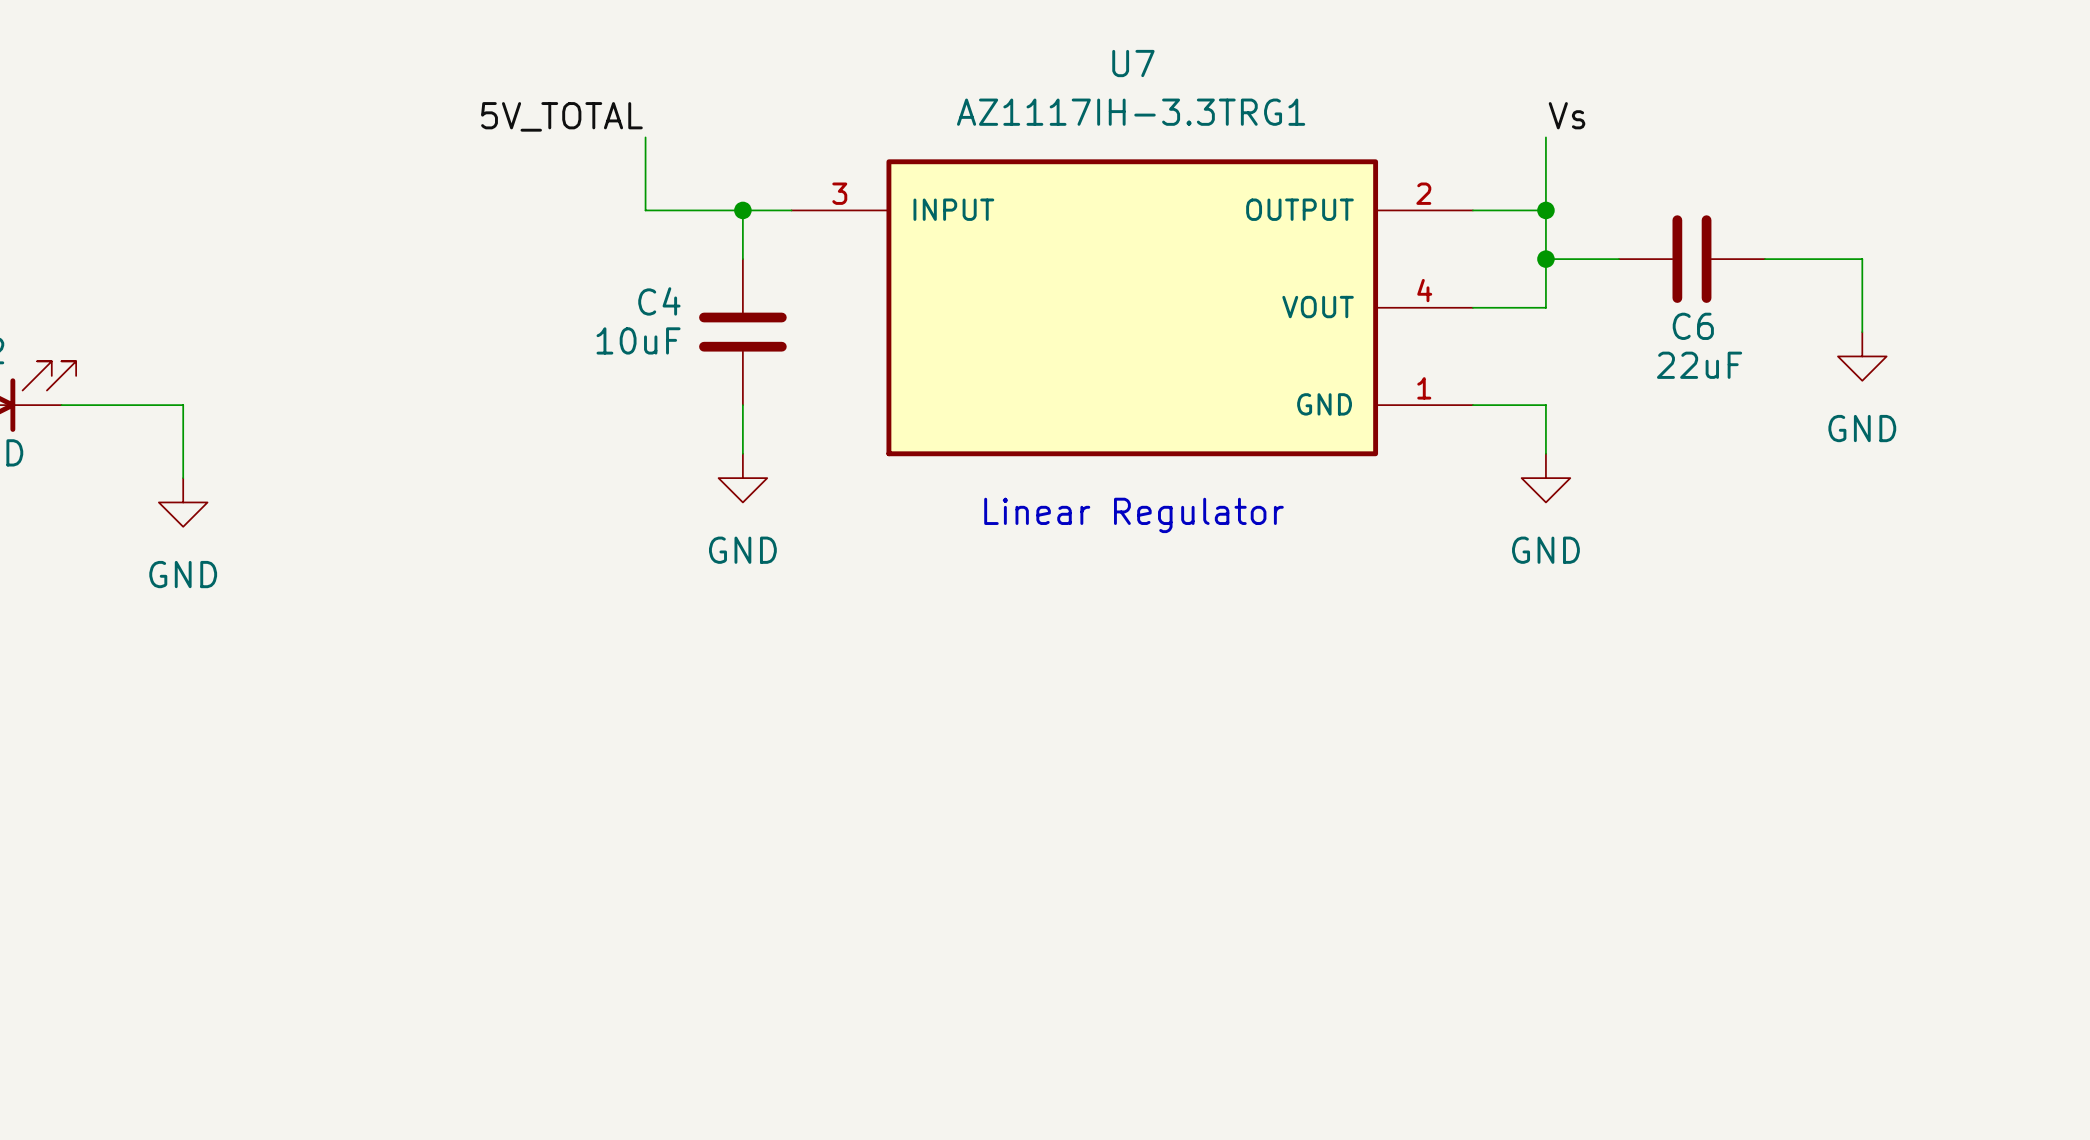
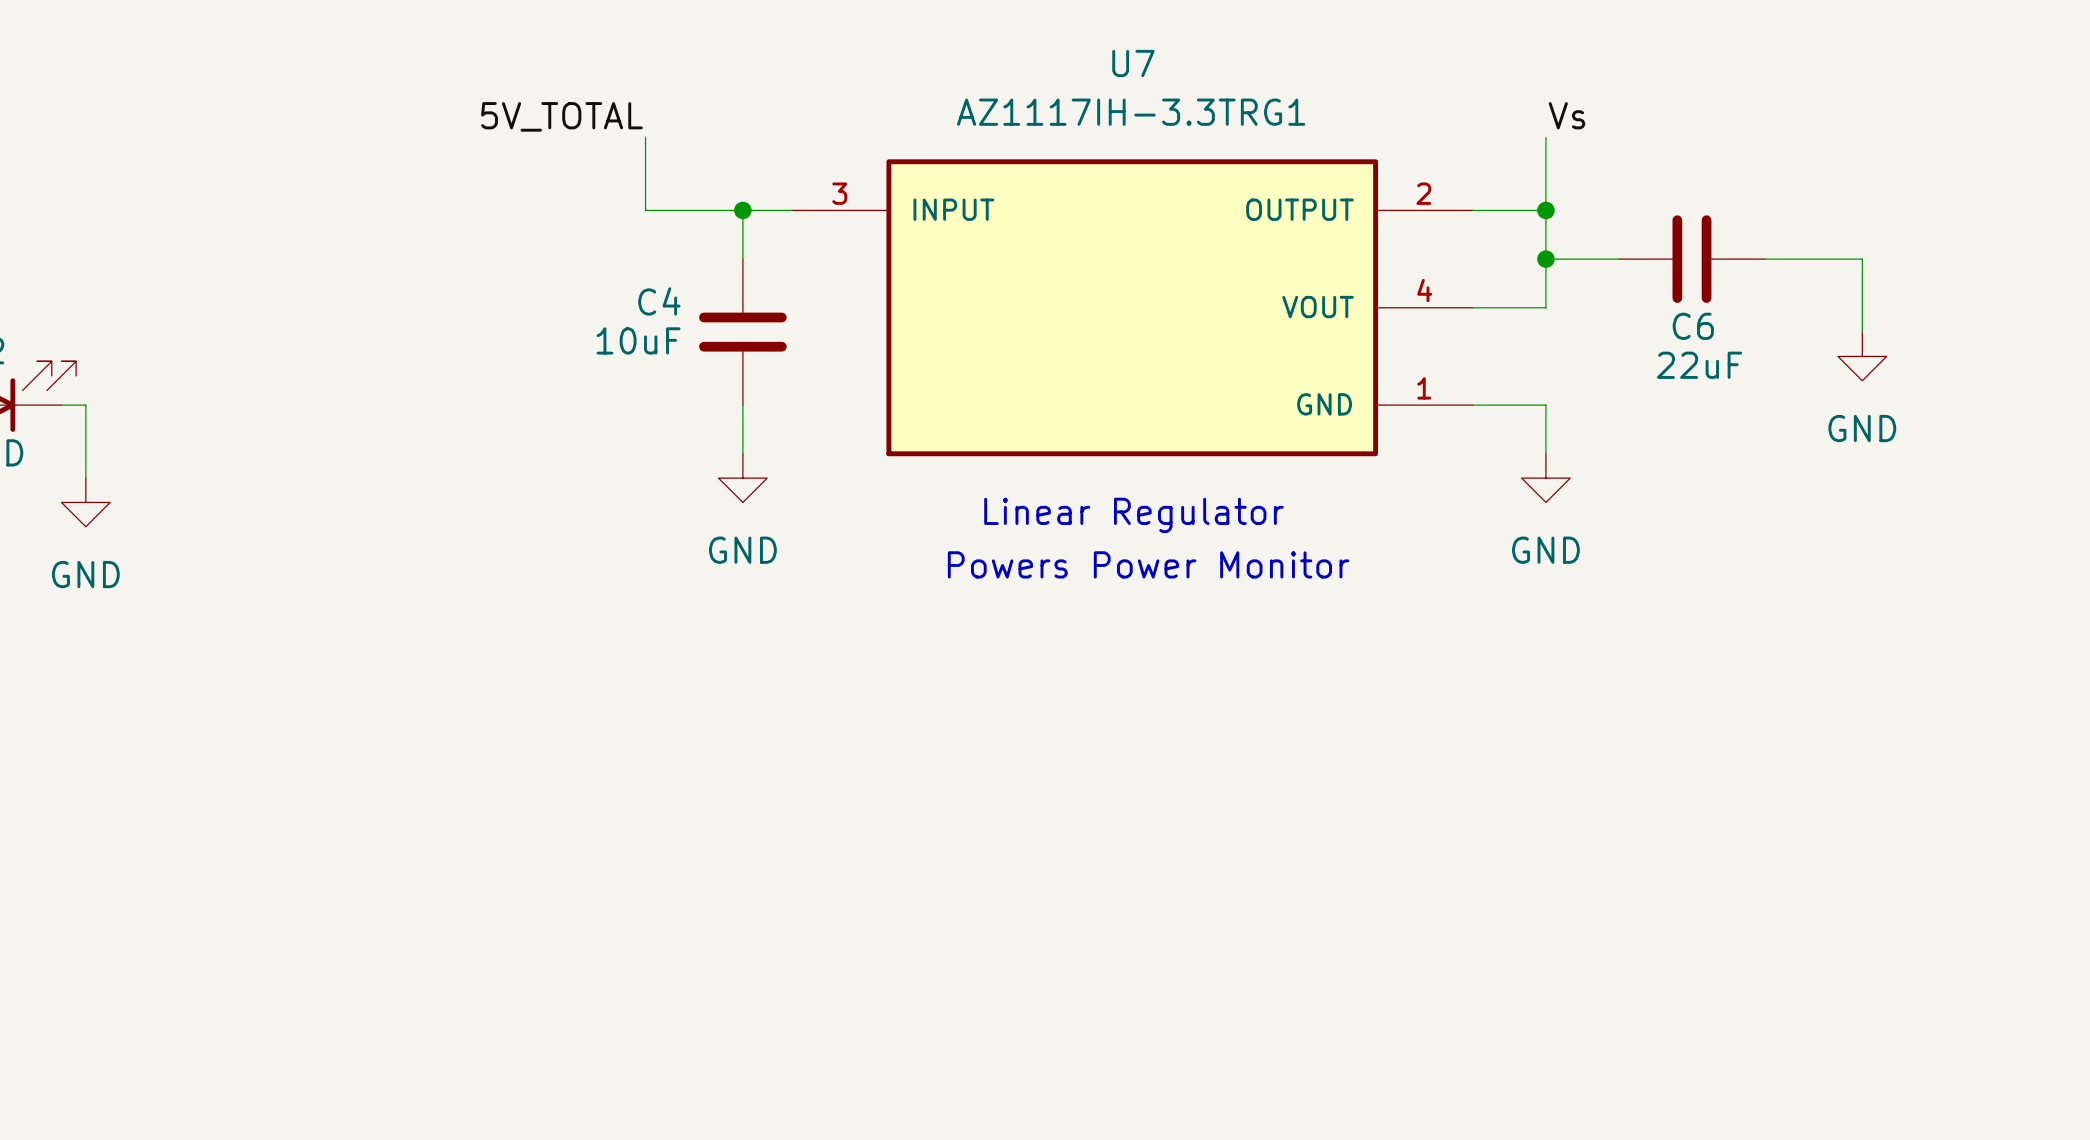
wire: (85, 405) (183, 405) (183, 478) -> (85, 405) (85, 478)
power symbol position: GND (183, 502) -> GND (85, 502)
text: none -> Powers Power Monitor (1148, 564)

